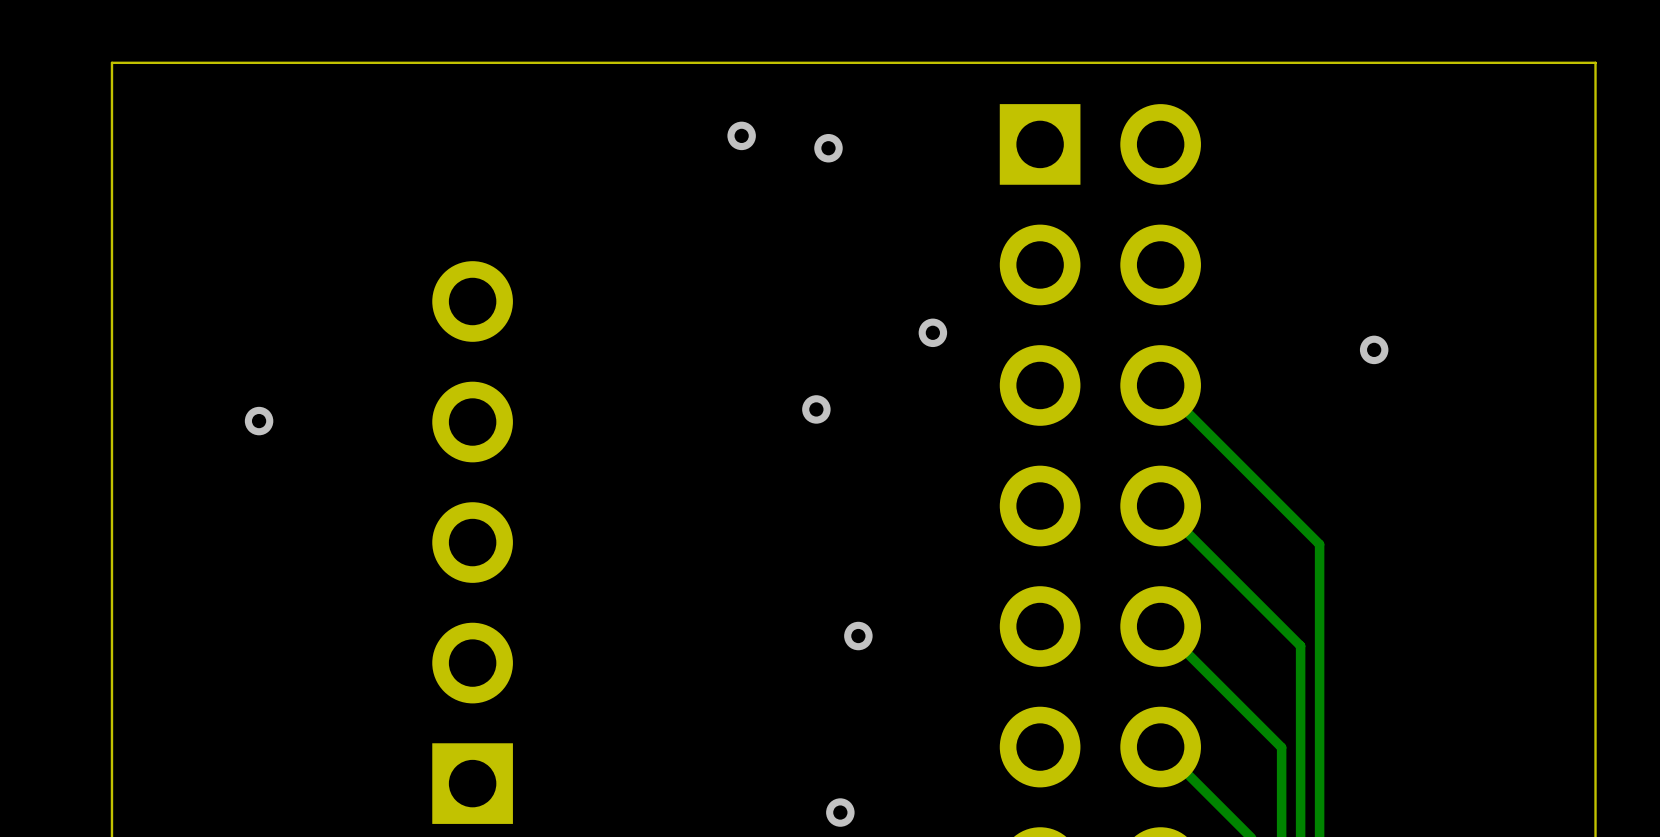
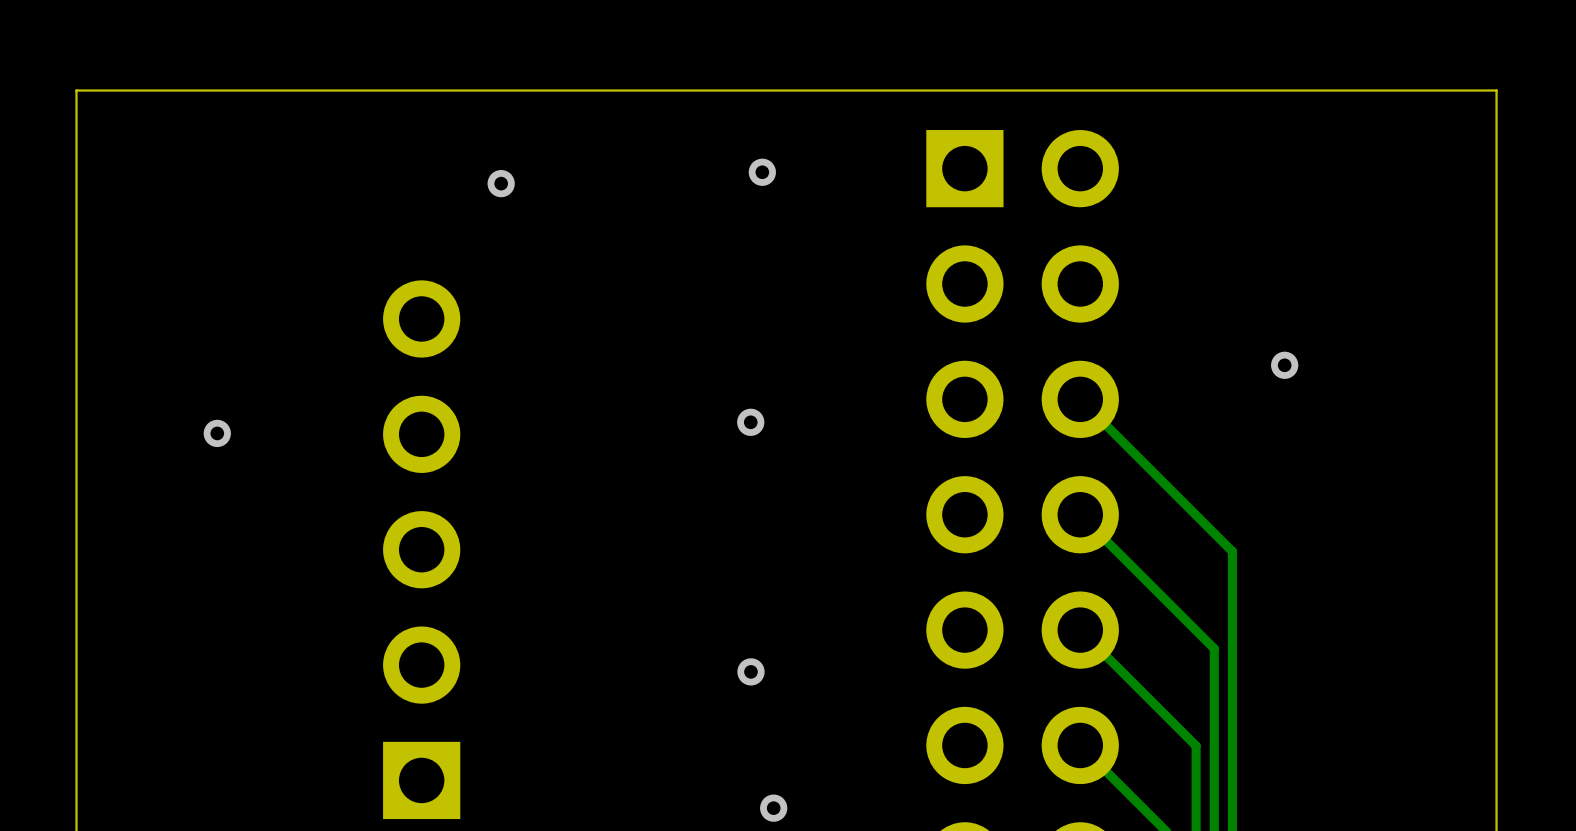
via position: (741, 135) -> (501, 183)
via: (932, 332) -> none
via position: (858, 636) -> (750, 671)

